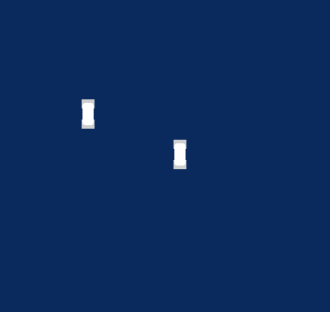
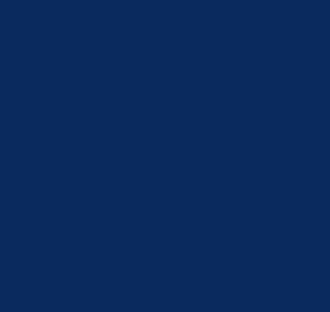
part: (88, 114) -> none
part: (179, 154) -> none

